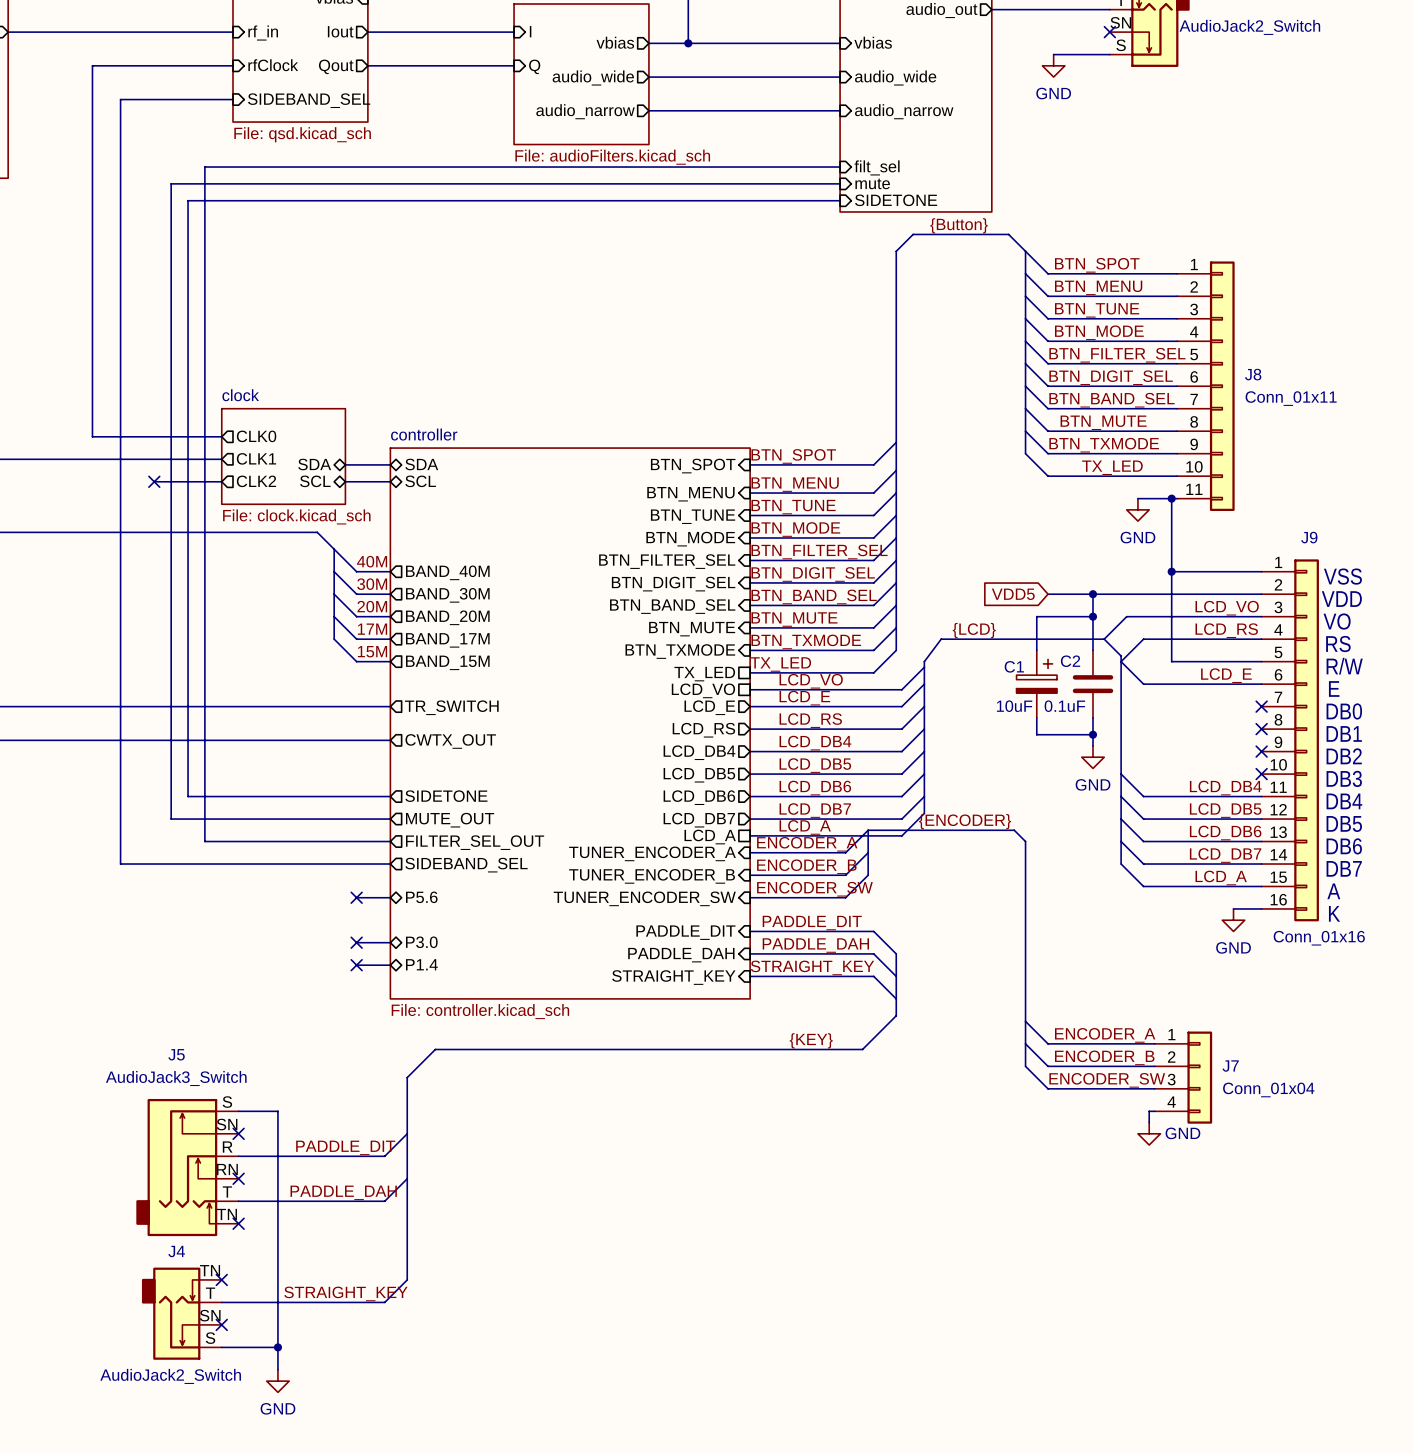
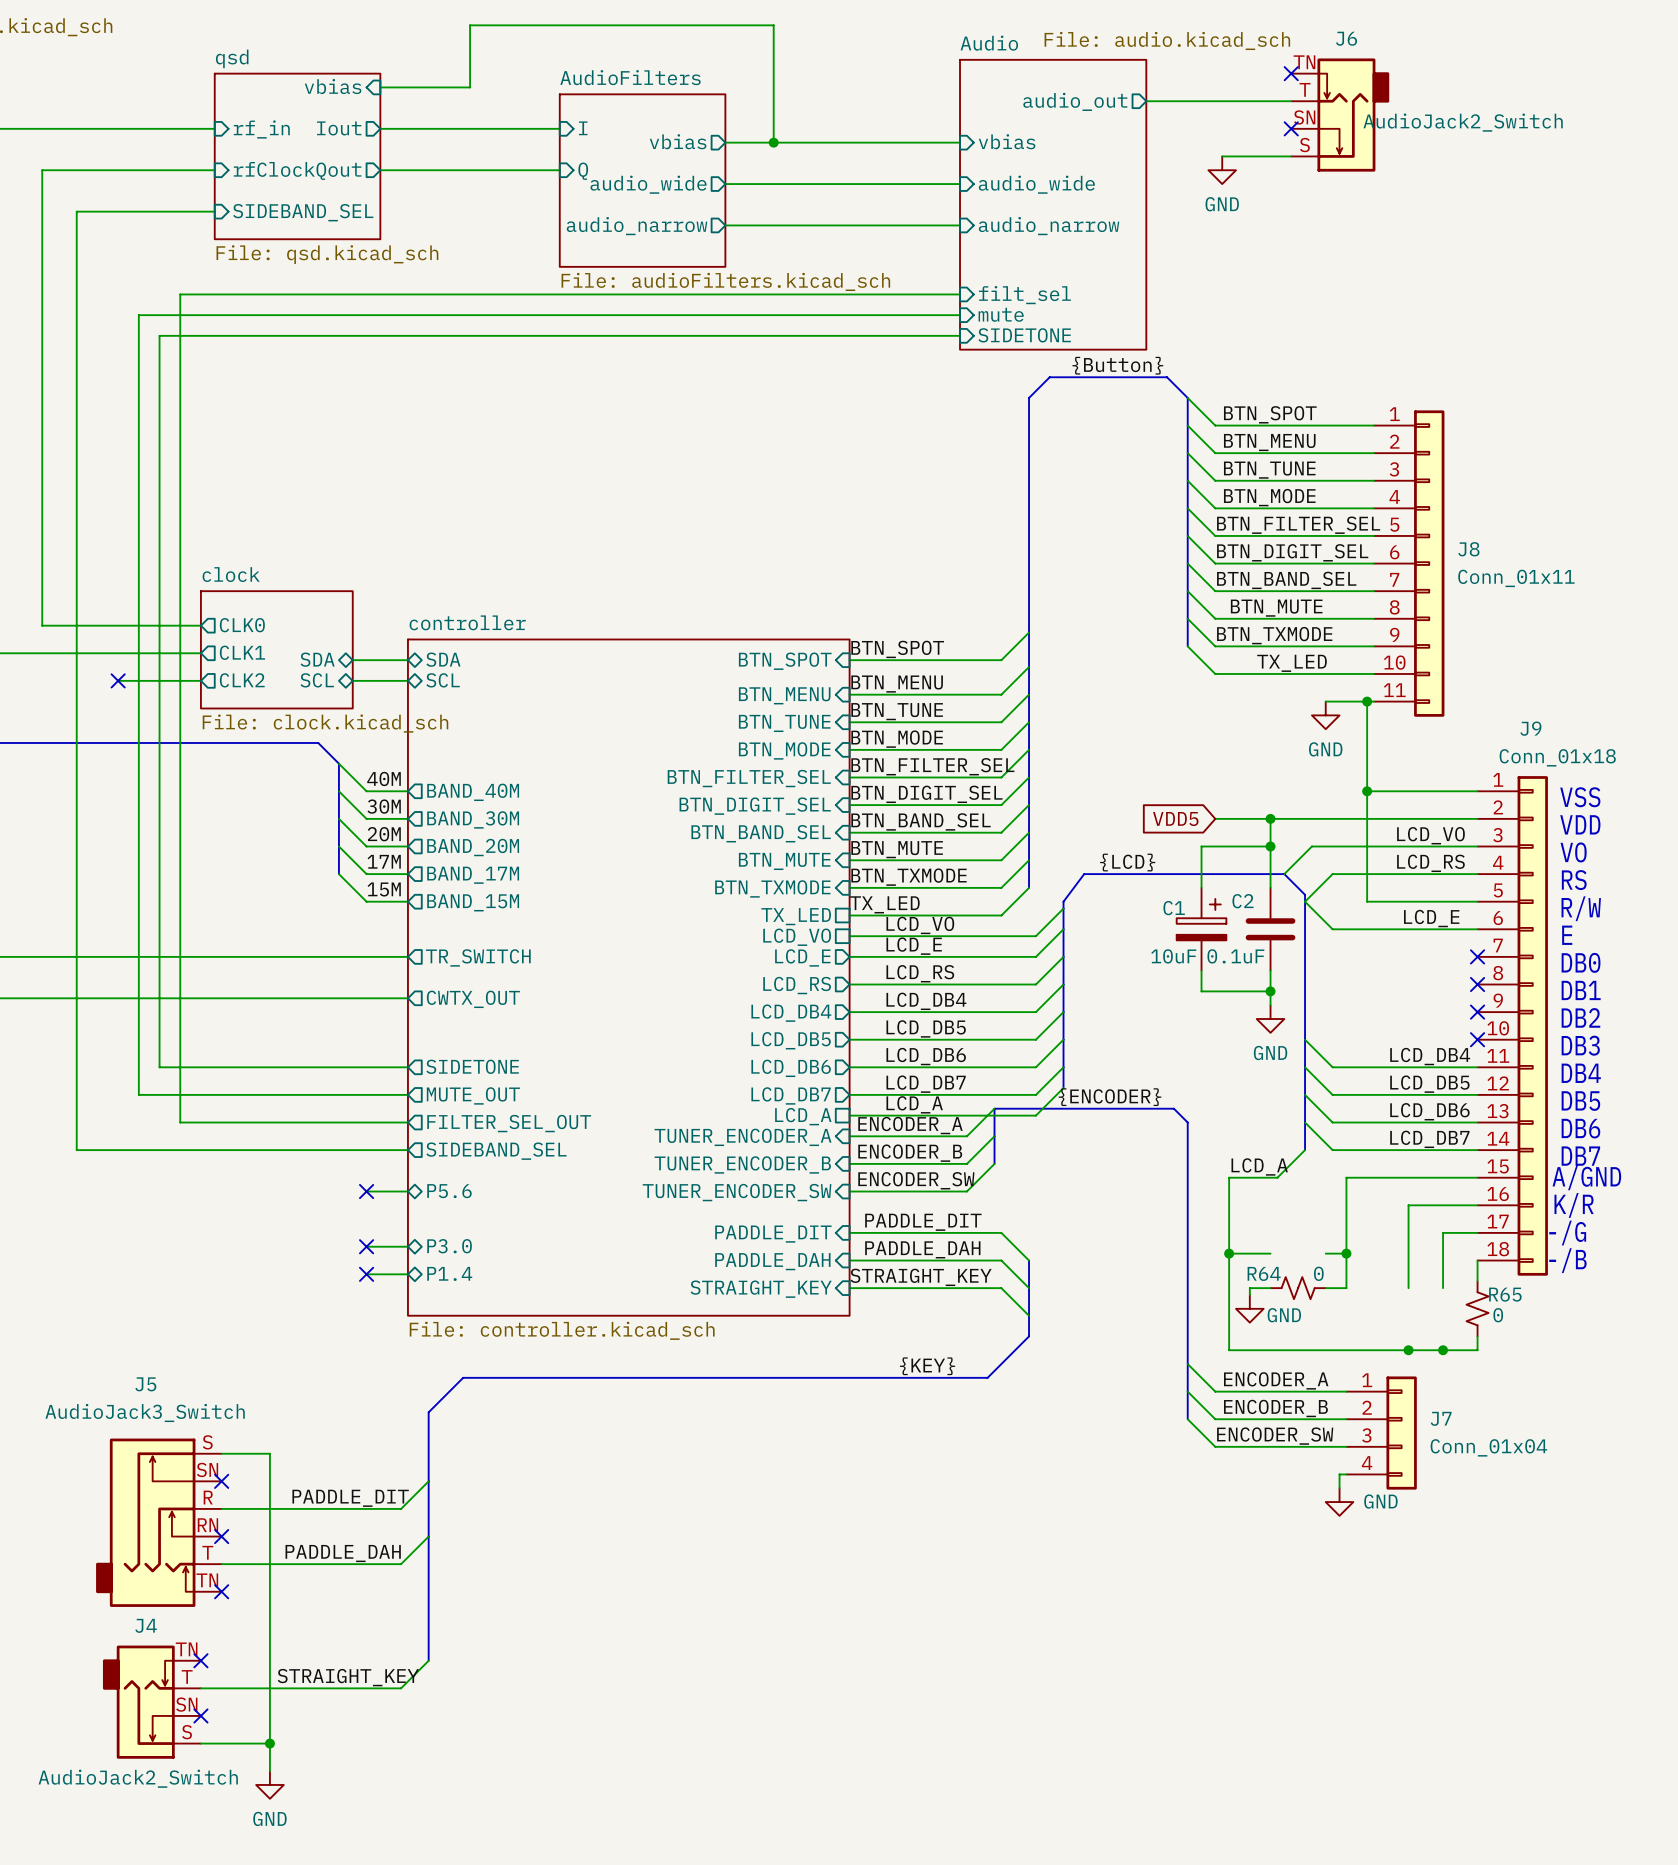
J9 name position: J9 (1309, 537) -> J9 (1530, 728)
J9 symbol: [1261, 559, 1319, 922] -> [1477, 776, 1548, 1276]
wire: (1121, 864) (1143, 886) (1154, 886) -> (1325, 1288) (1346, 1288) (1346, 1177)
wire: none -> (1305, 1150) (1277, 1177) (1229, 1177) (1229, 1350) (1477, 1350) (1477, 1336)
label position: LCD_A (1221, 878) -> LCD_A (1259, 1166)
text: none -> A/GND (1586, 1177)
text: A (1333, 891) -> none
text: none -> K/R (1574, 1205)
wire: none -> (1443, 1205) (1408, 1205) (1408, 1288)
text: K (1334, 913) -> none
power symbol: GND (1233, 920) -> none
text: none -> -/G (1567, 1233)
wire: none -> (1477, 1232) (1443, 1232) (1443, 1288)
J9 value: Conn_01x16 (1319, 938) -> Conn_01x18 (1557, 757)
wire: none -> (1229, 1253) (1270, 1253)
junction: none -> (1229, 1253)
wire: none -> (1325, 1253) (1346, 1253)
junction: none -> (1346, 1253)
text: none -> -/B (1567, 1260)
wire: none -> (1477, 1260) (1477, 1281)
wire: none -> (1270, 1288) (1249, 1288) (1249, 1295)
R64: none -> 0 (1298, 1288)
power symbol: none -> GND (1249, 1308)
R65: none -> 0 (1477, 1308)
wire: (1025, 1021) (1048, 1043) (1154, 1043) -> (1187, 1364) (1215, 1391) (1346, 1391)
junction: none -> (1408, 1350)
junction: none -> (1443, 1350)
label position: ENCODER_A (1105, 1035) -> ENCODER_A (1276, 1380)
wire: (1025, 1043) (1048, 1066) (1154, 1066) -> none
label position: ENCODER_B (1104, 1057) -> ENCODER_B (1275, 1408)
wire: none -> (1187, 1391) (1215, 1419)
wire: (1025, 1066) (1048, 1088) (1154, 1088) -> (1187, 1419) (1215, 1446) (1346, 1446)
bus: none -> (1187, 1398) (1187, 1419)
J7 position: (1183, 1077) -> (1381, 1433)
label position: ENCODER_SW (1107, 1080) -> ENCODER_SW (1275, 1436)
wire: none -> (1215, 1419) (1346, 1419)
wire: (1154, 1111) (1149, 1111) (1149, 1122) -> (1346, 1474) (1339, 1474) (1339, 1488)
power symbol position: GND (1149, 1133) -> GND (1339, 1502)

